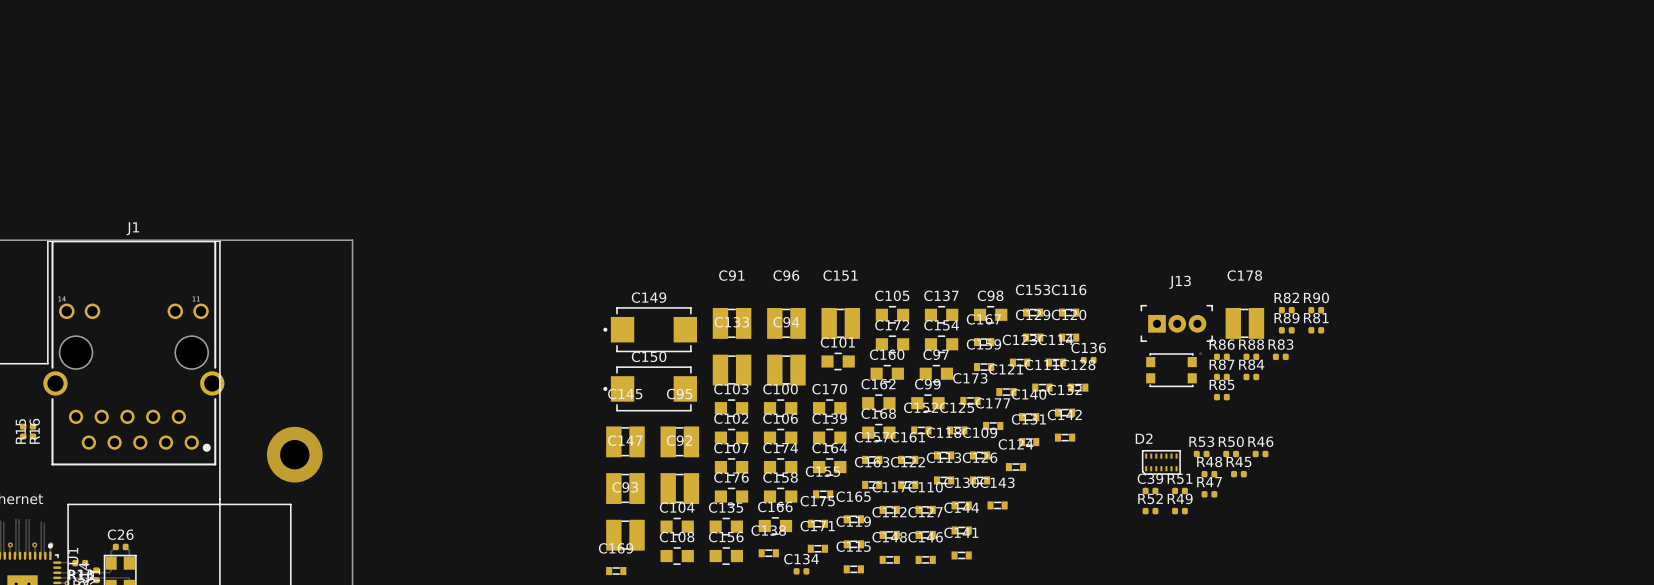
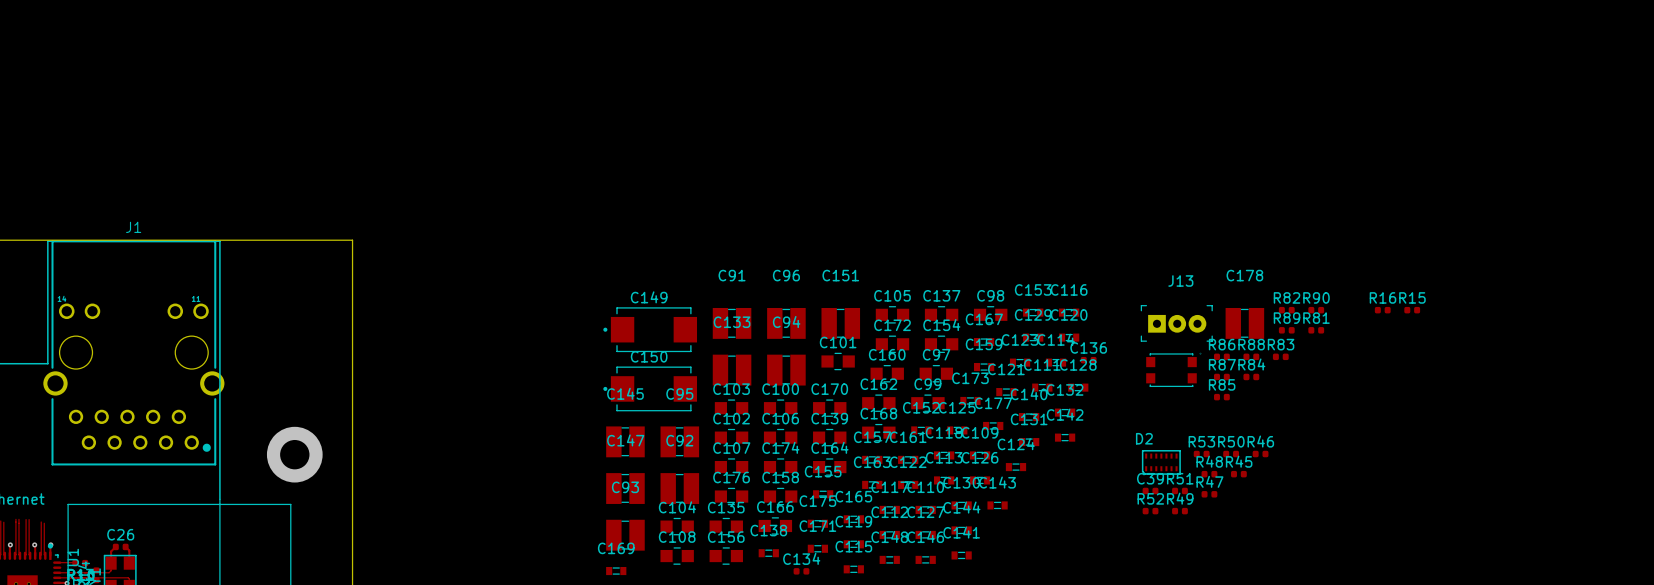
R16 rotation: 0° (23, 431) -> 90° clockwise (1382, 310)
R16 position: (23, 431) -> (1382, 310)
R15 rotation: 0° (33, 431) -> 90° clockwise (1412, 310)
R15 position: (33, 431) -> (1412, 310)

